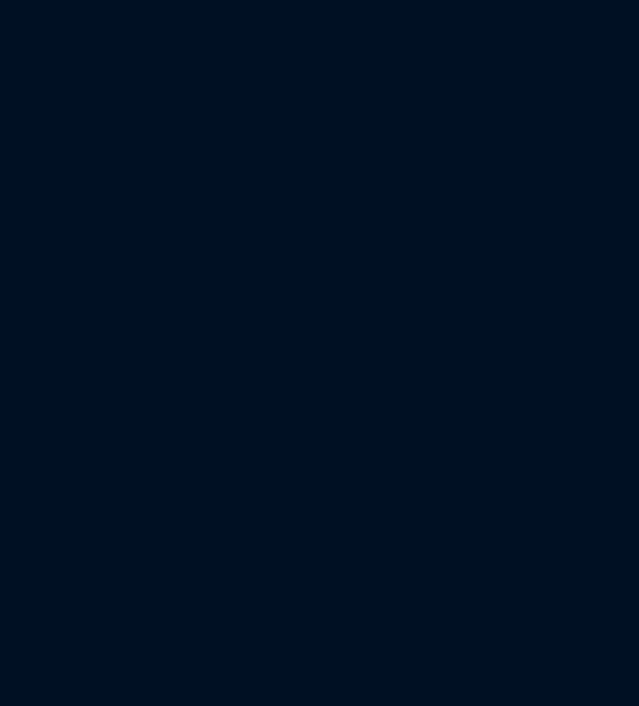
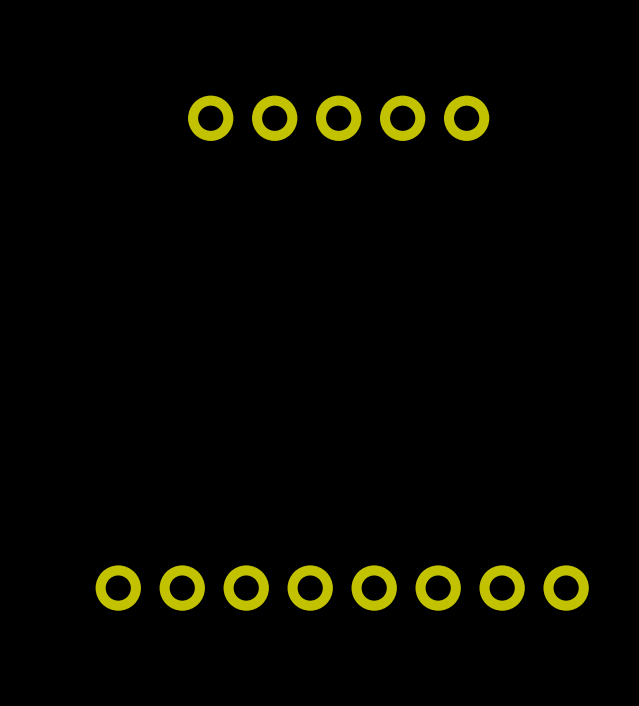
part: none -> (338, 118)
part: none -> (342, 588)

